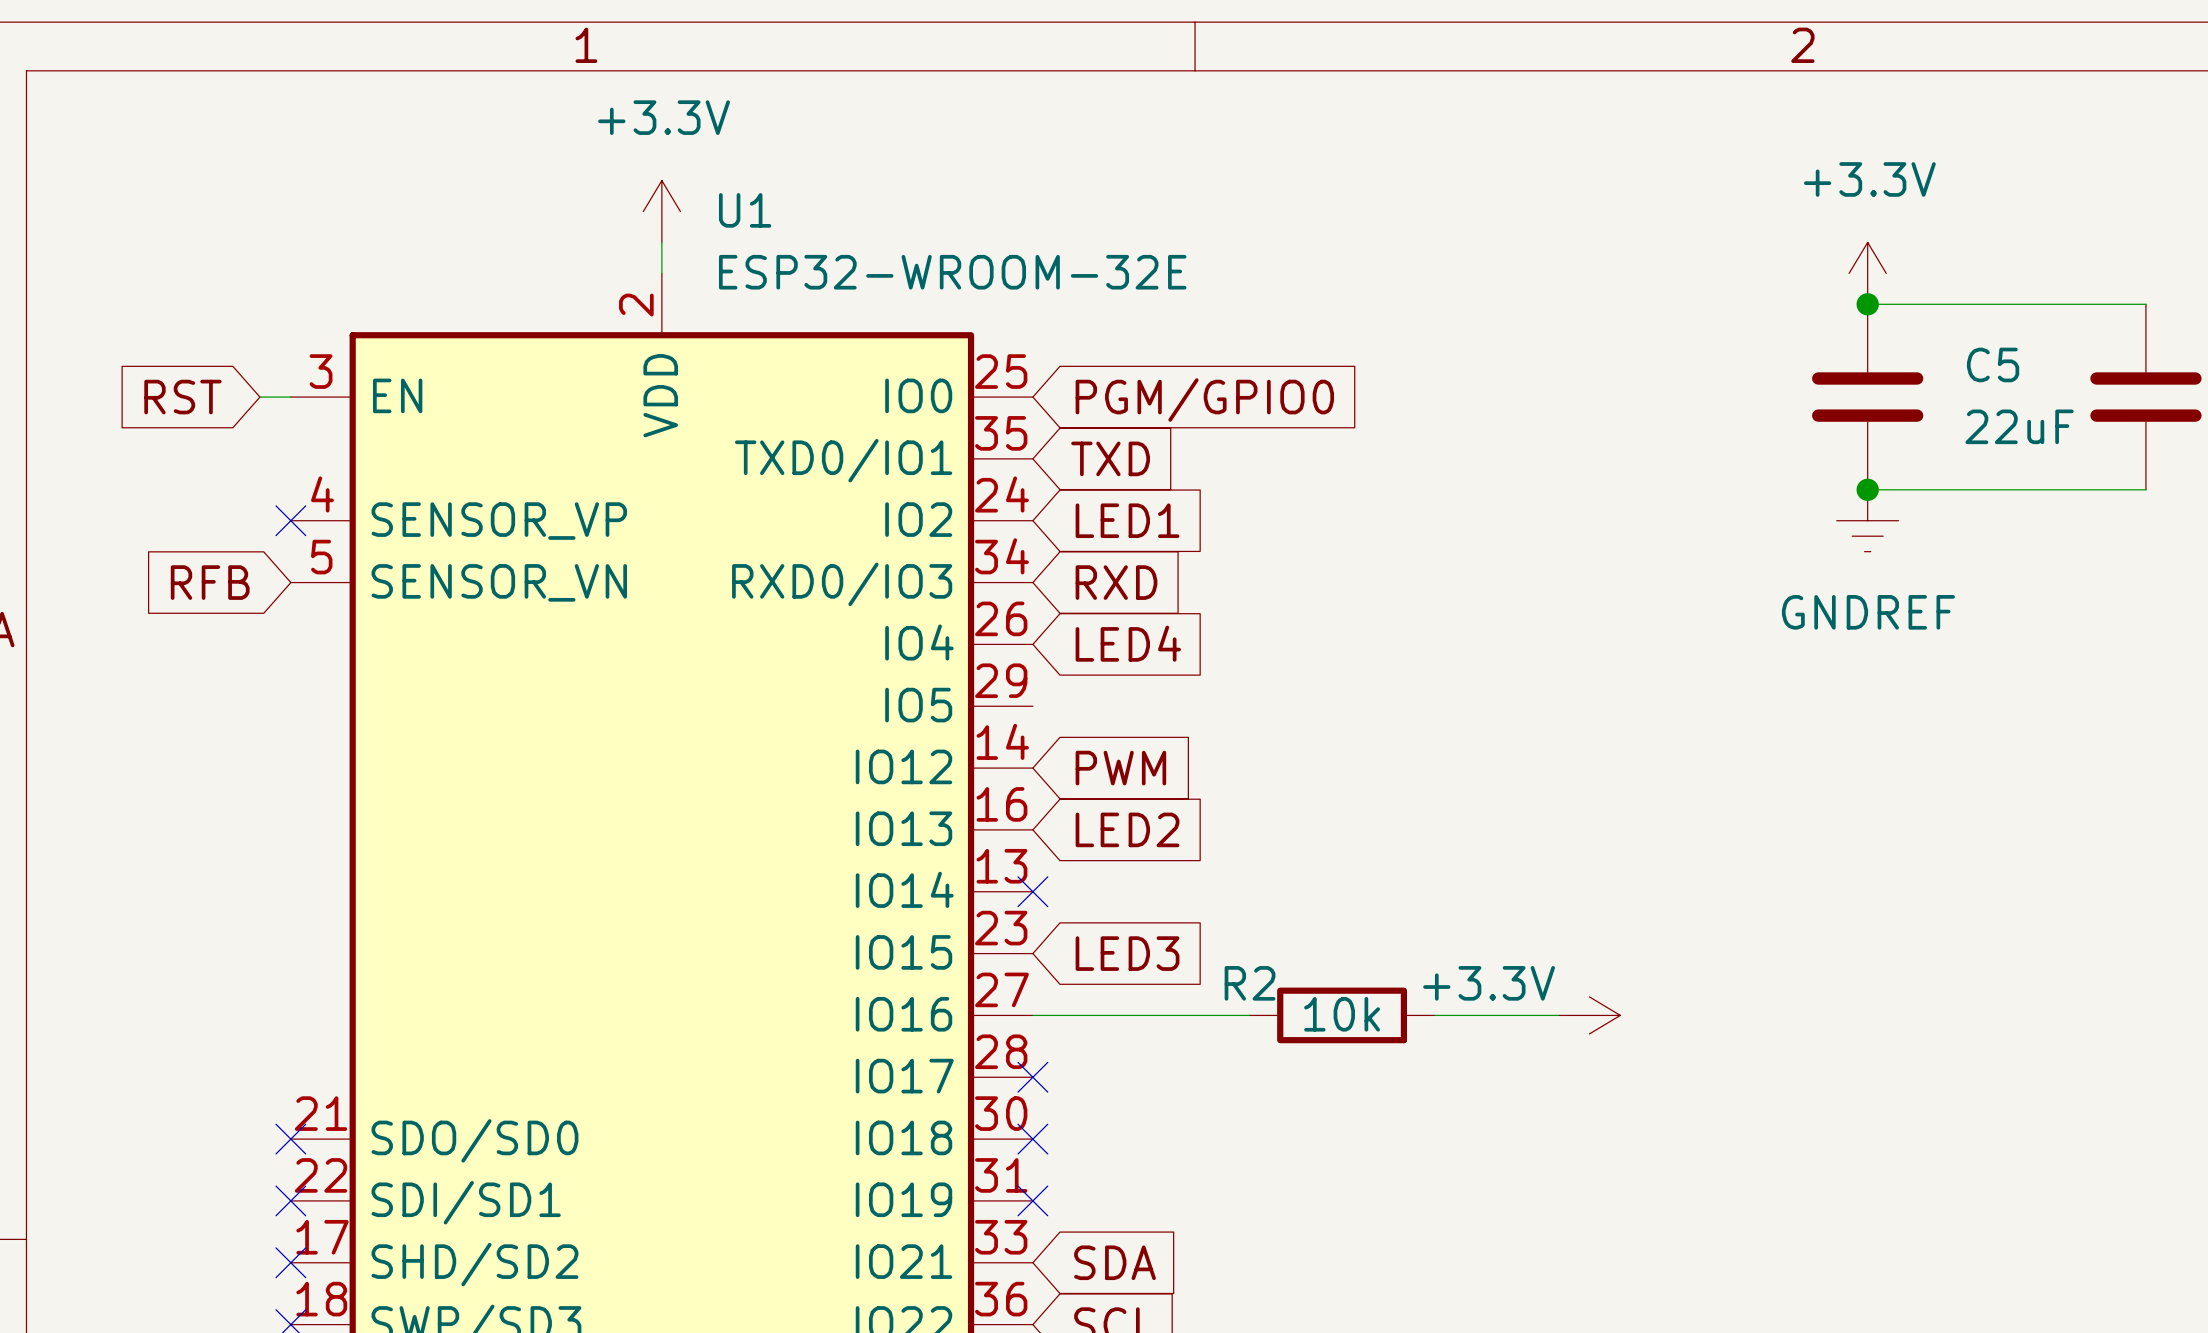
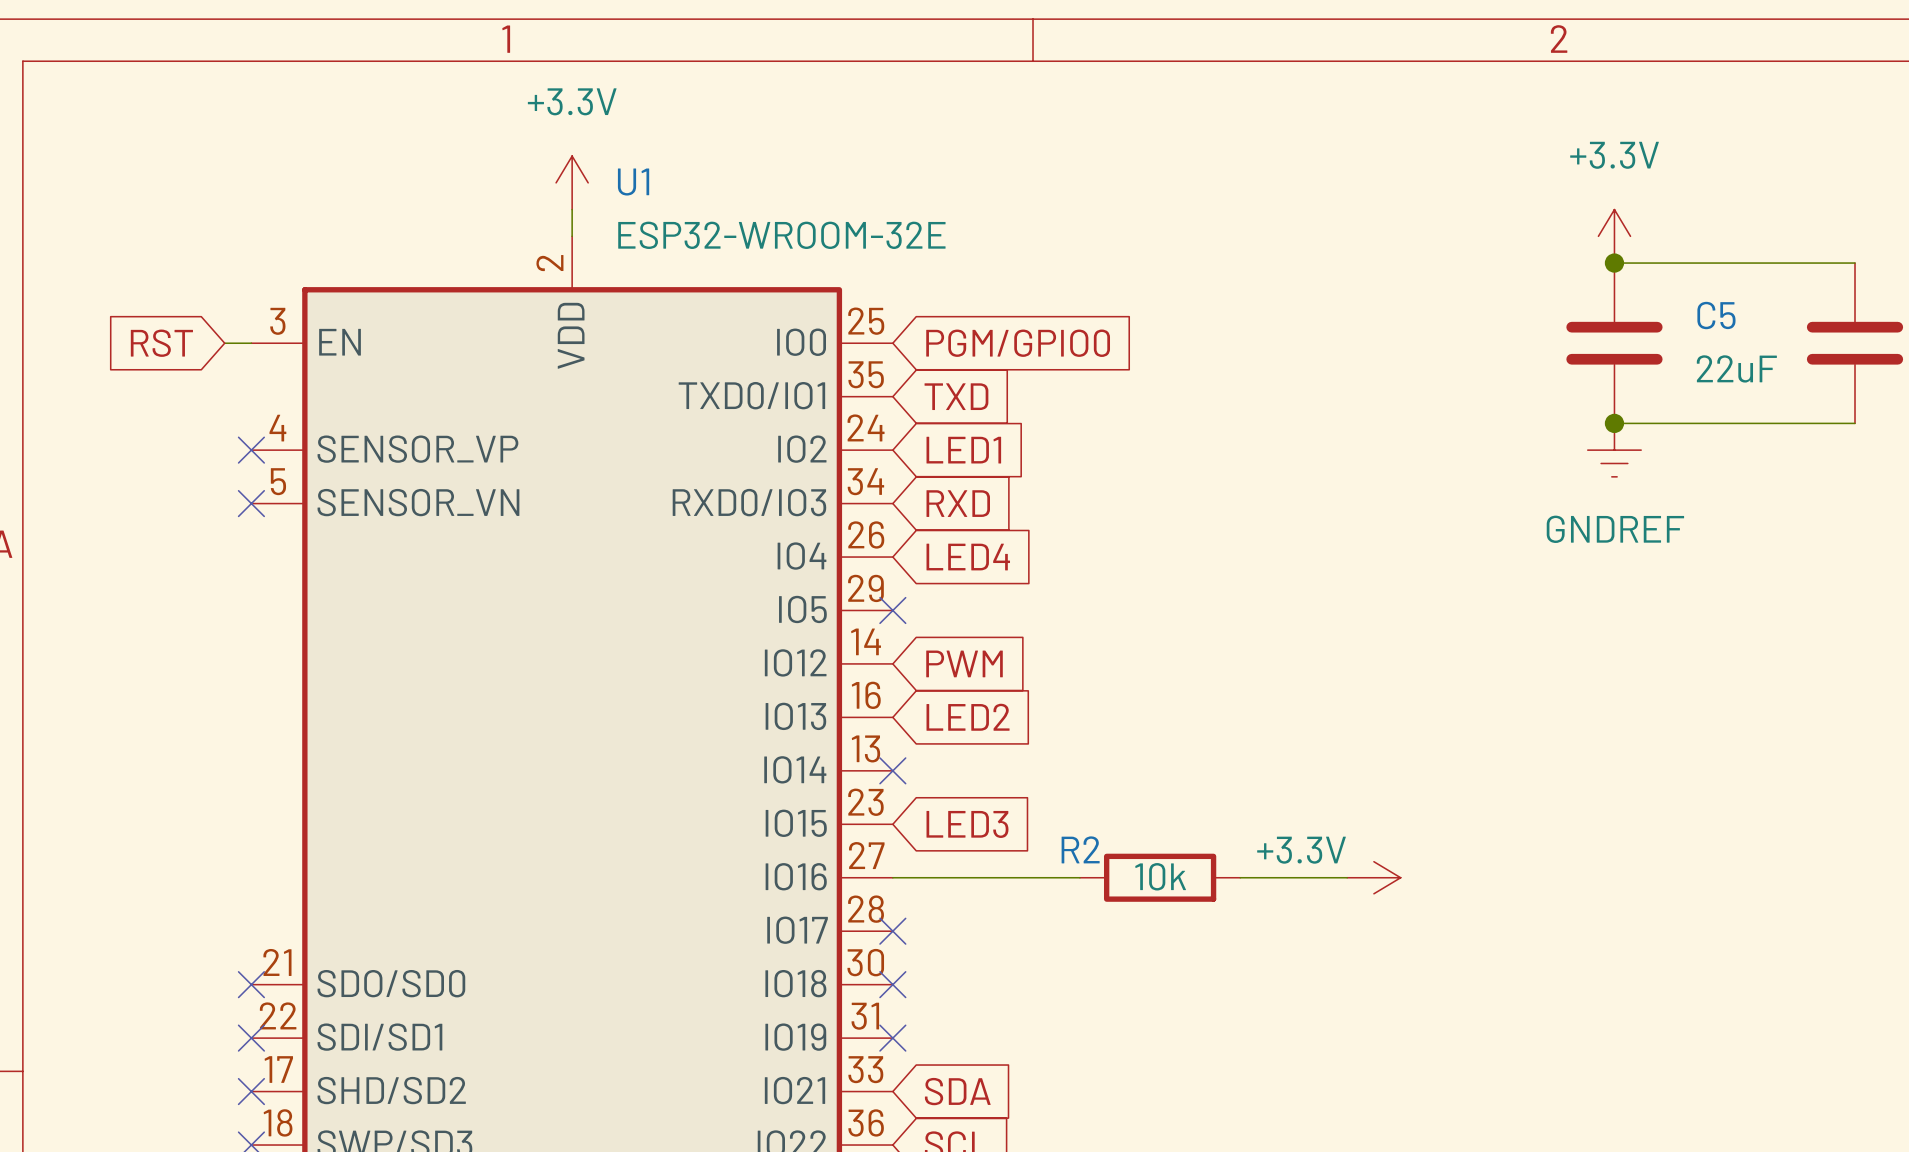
global label: RFB (210, 582) -> none
no-connect mark: none -> (251, 503)
no-connect mark: none -> (892, 610)

